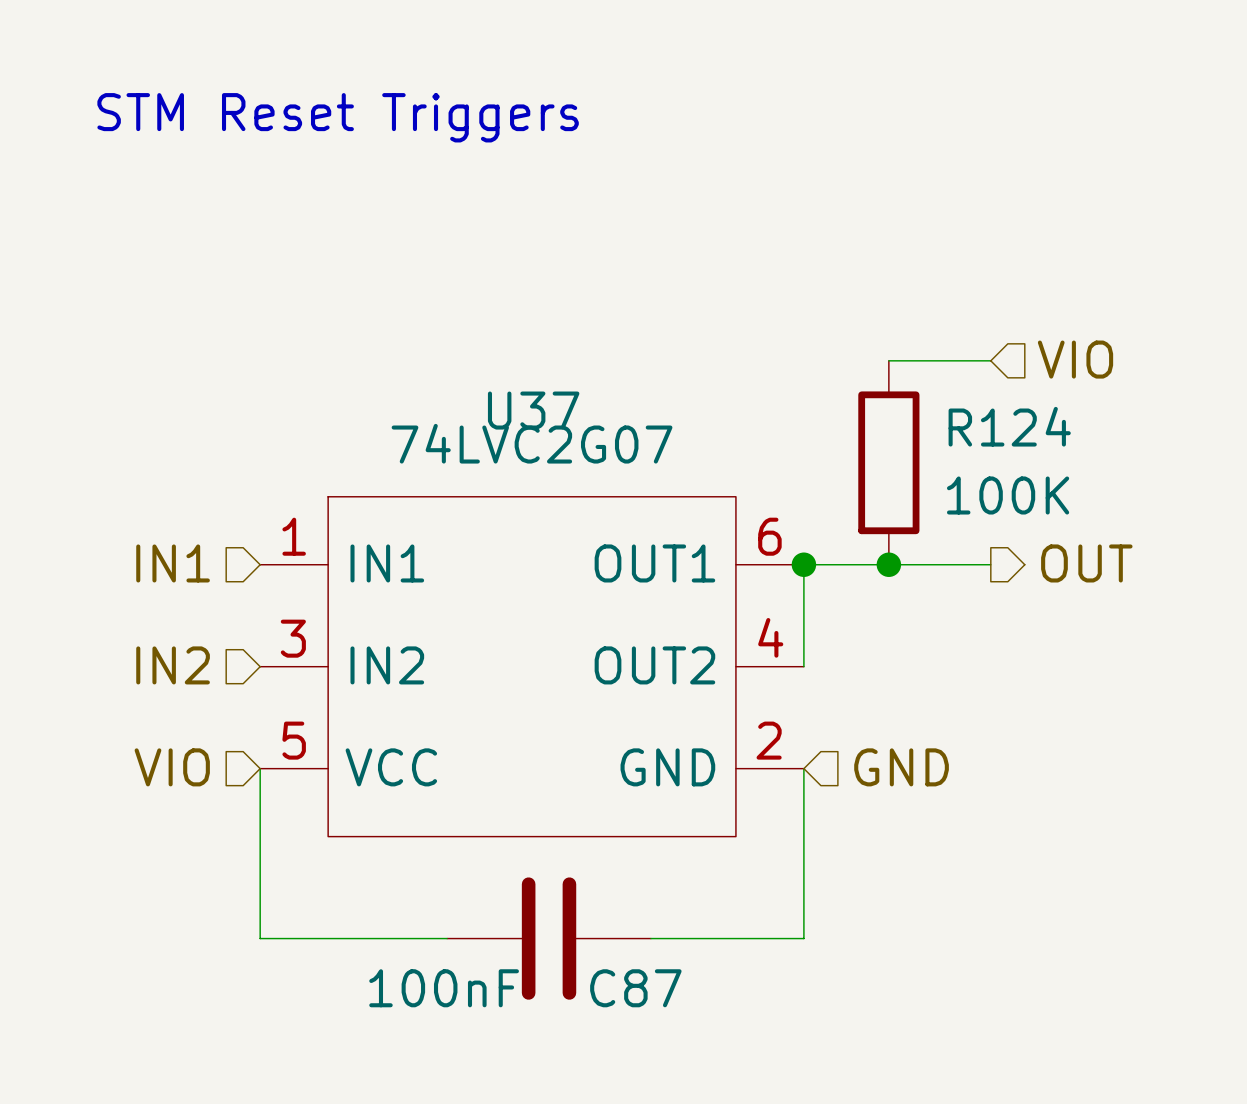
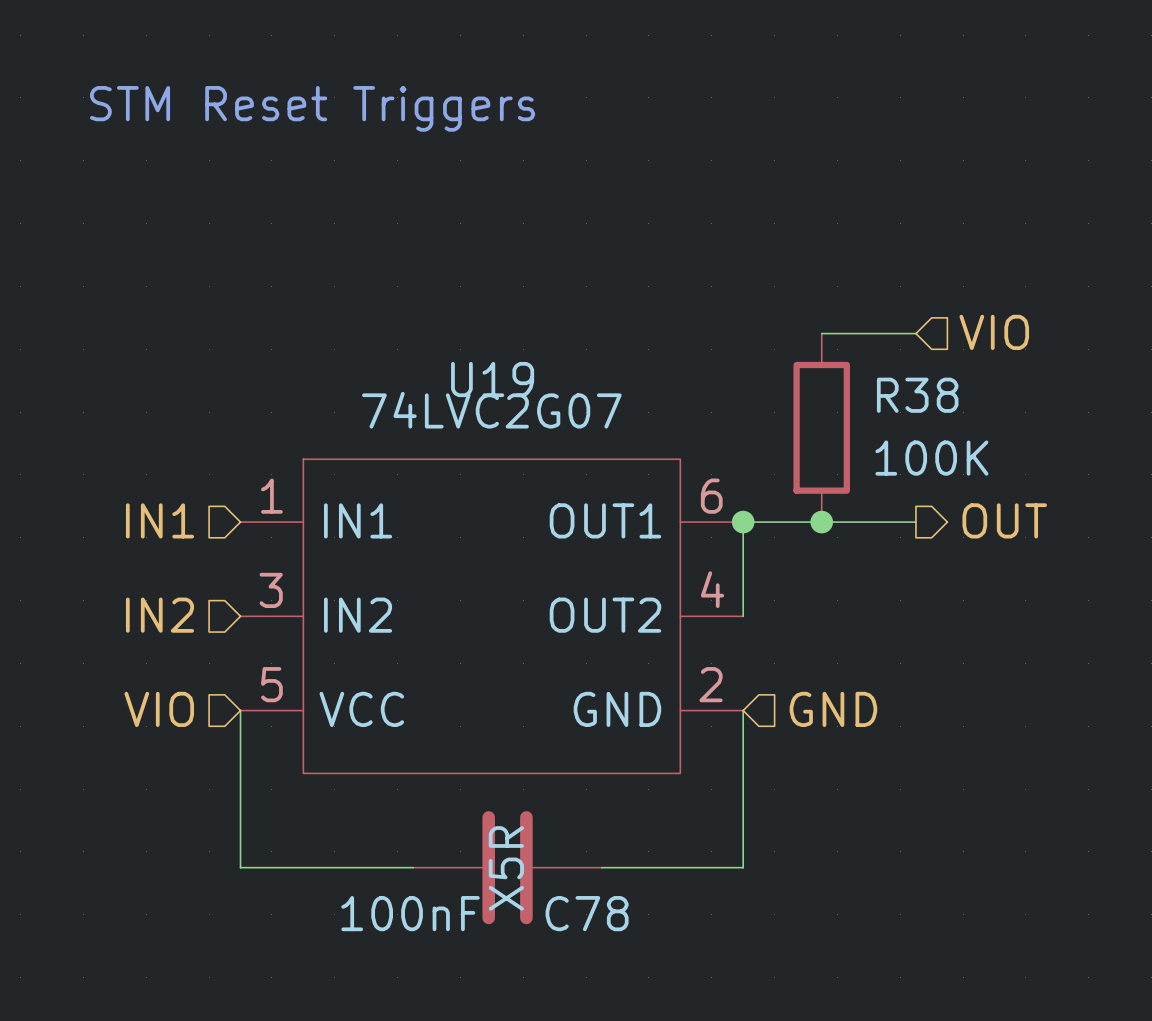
U37 name: U37 (533, 410) -> U19 (492, 379)
R124 name: R124 (1009, 426) -> R38 (917, 395)
C87 text: none -> X5R (506, 868)
C87 name: C87 (635, 988) -> C78 (587, 913)

